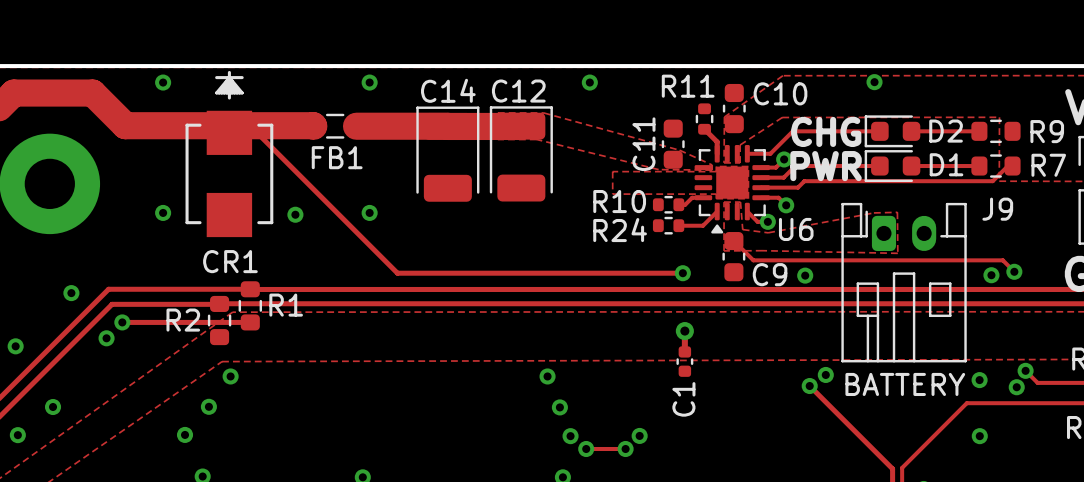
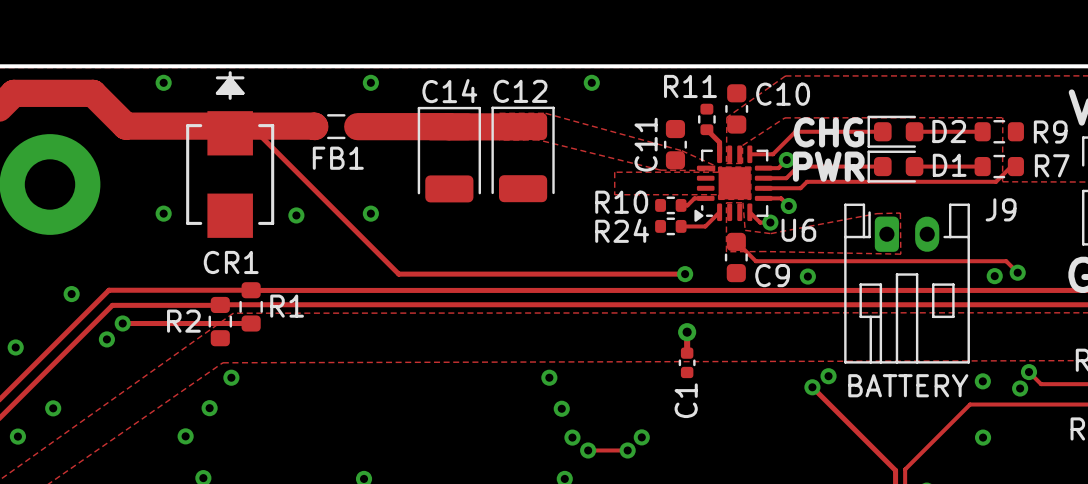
via: (874, 82) -> none
U6 footprint: [694, 144, 770, 234] -> [694, 145, 773, 222]

